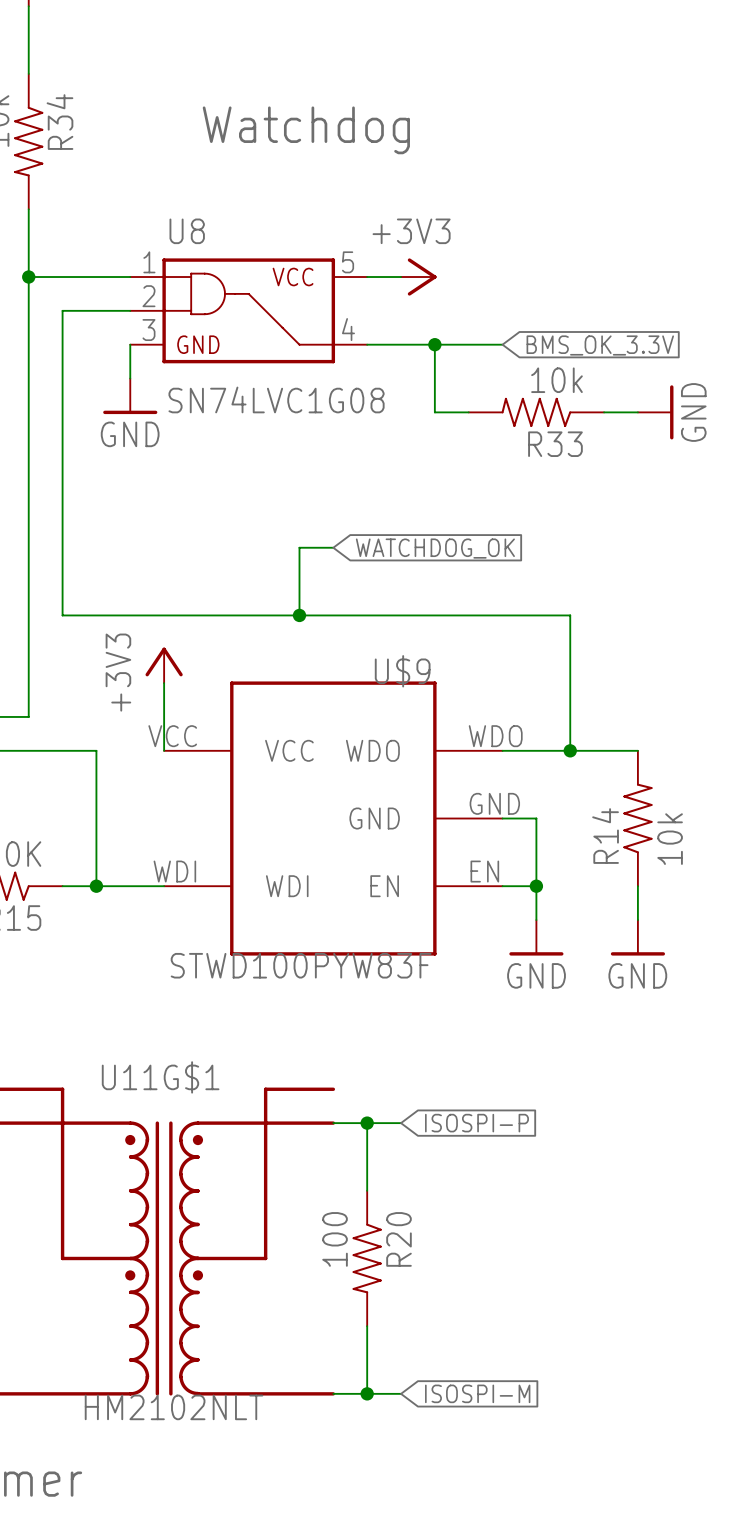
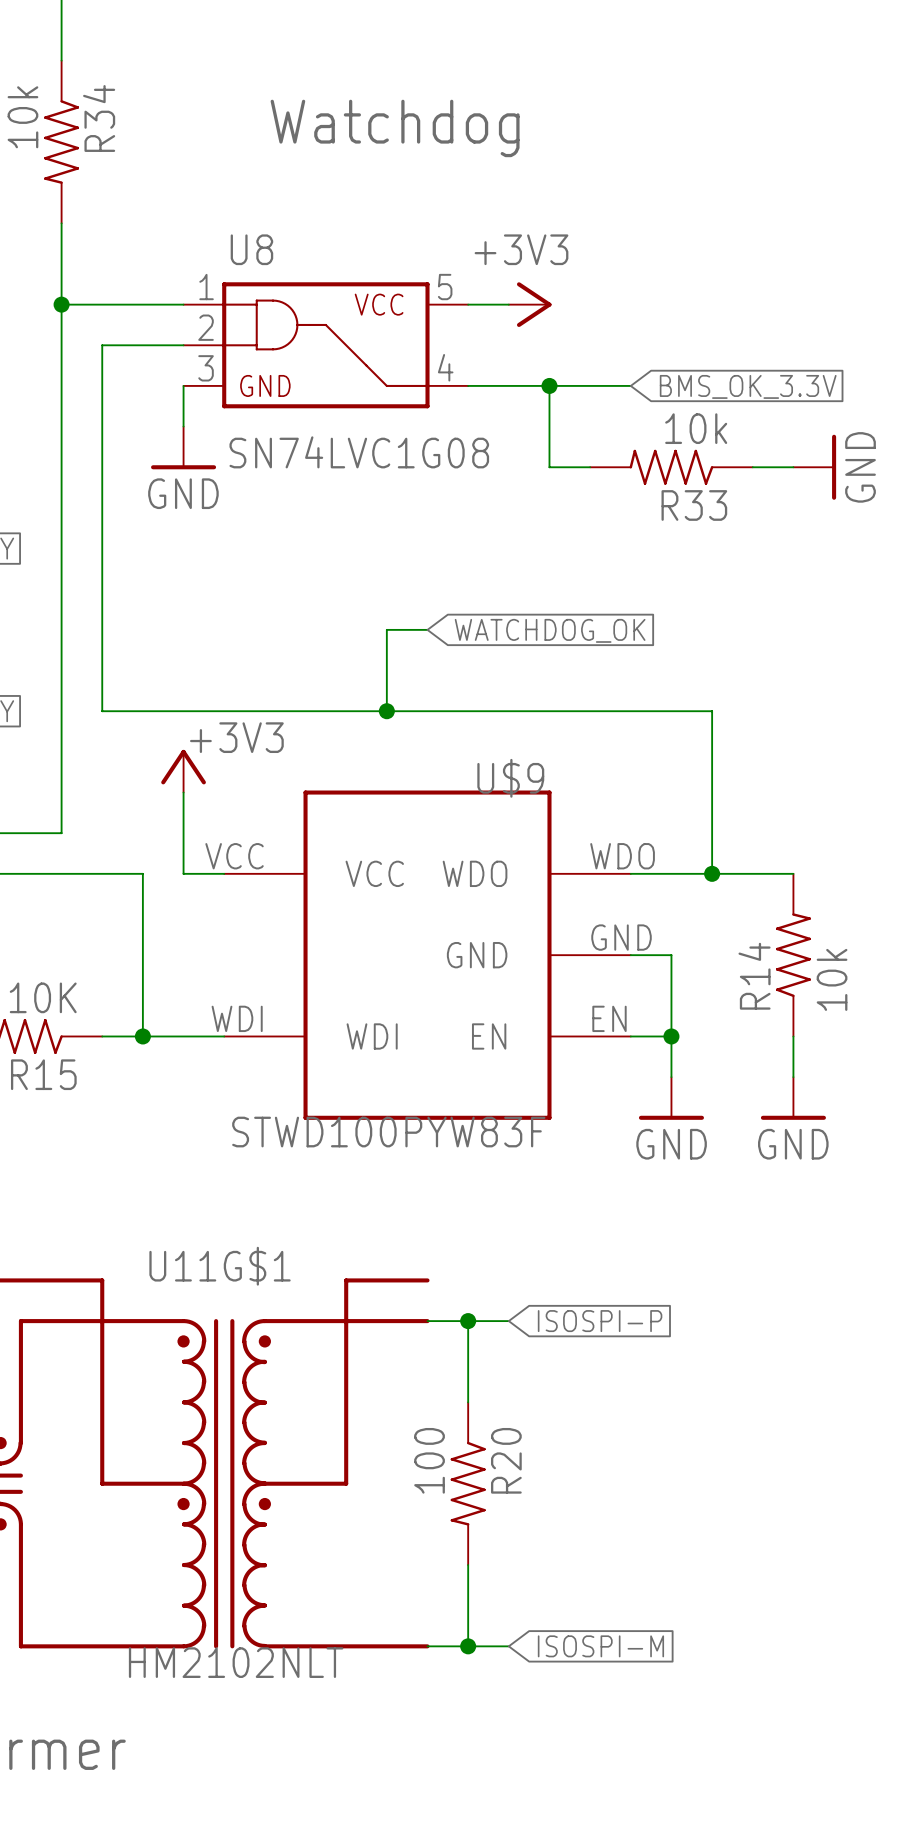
power symbol position: +3V3 (164, 665) -> +3V3 (183, 771)
power symbol text rotation: 0° (118, 672) -> 90° clockwise (236, 737)
wire: (164, 683) (164, 750) -> (183, 792) (183, 873) (224, 873)

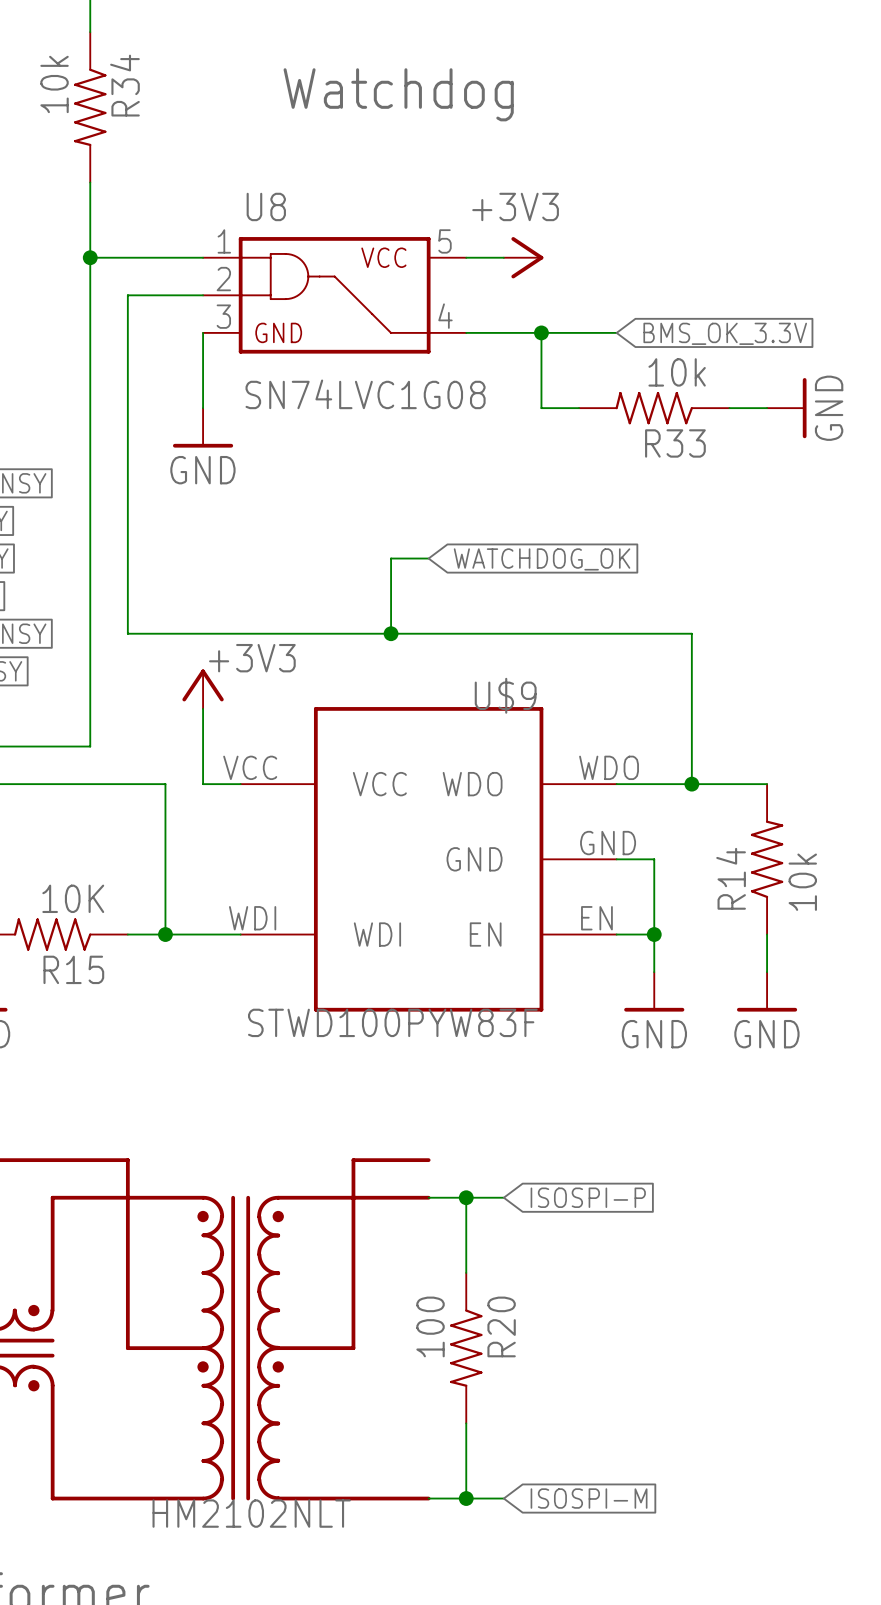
power symbol position: GND (183, 447) -> GND (203, 427)
U11G$1 name: U11G$1 (220, 1266) -> none

